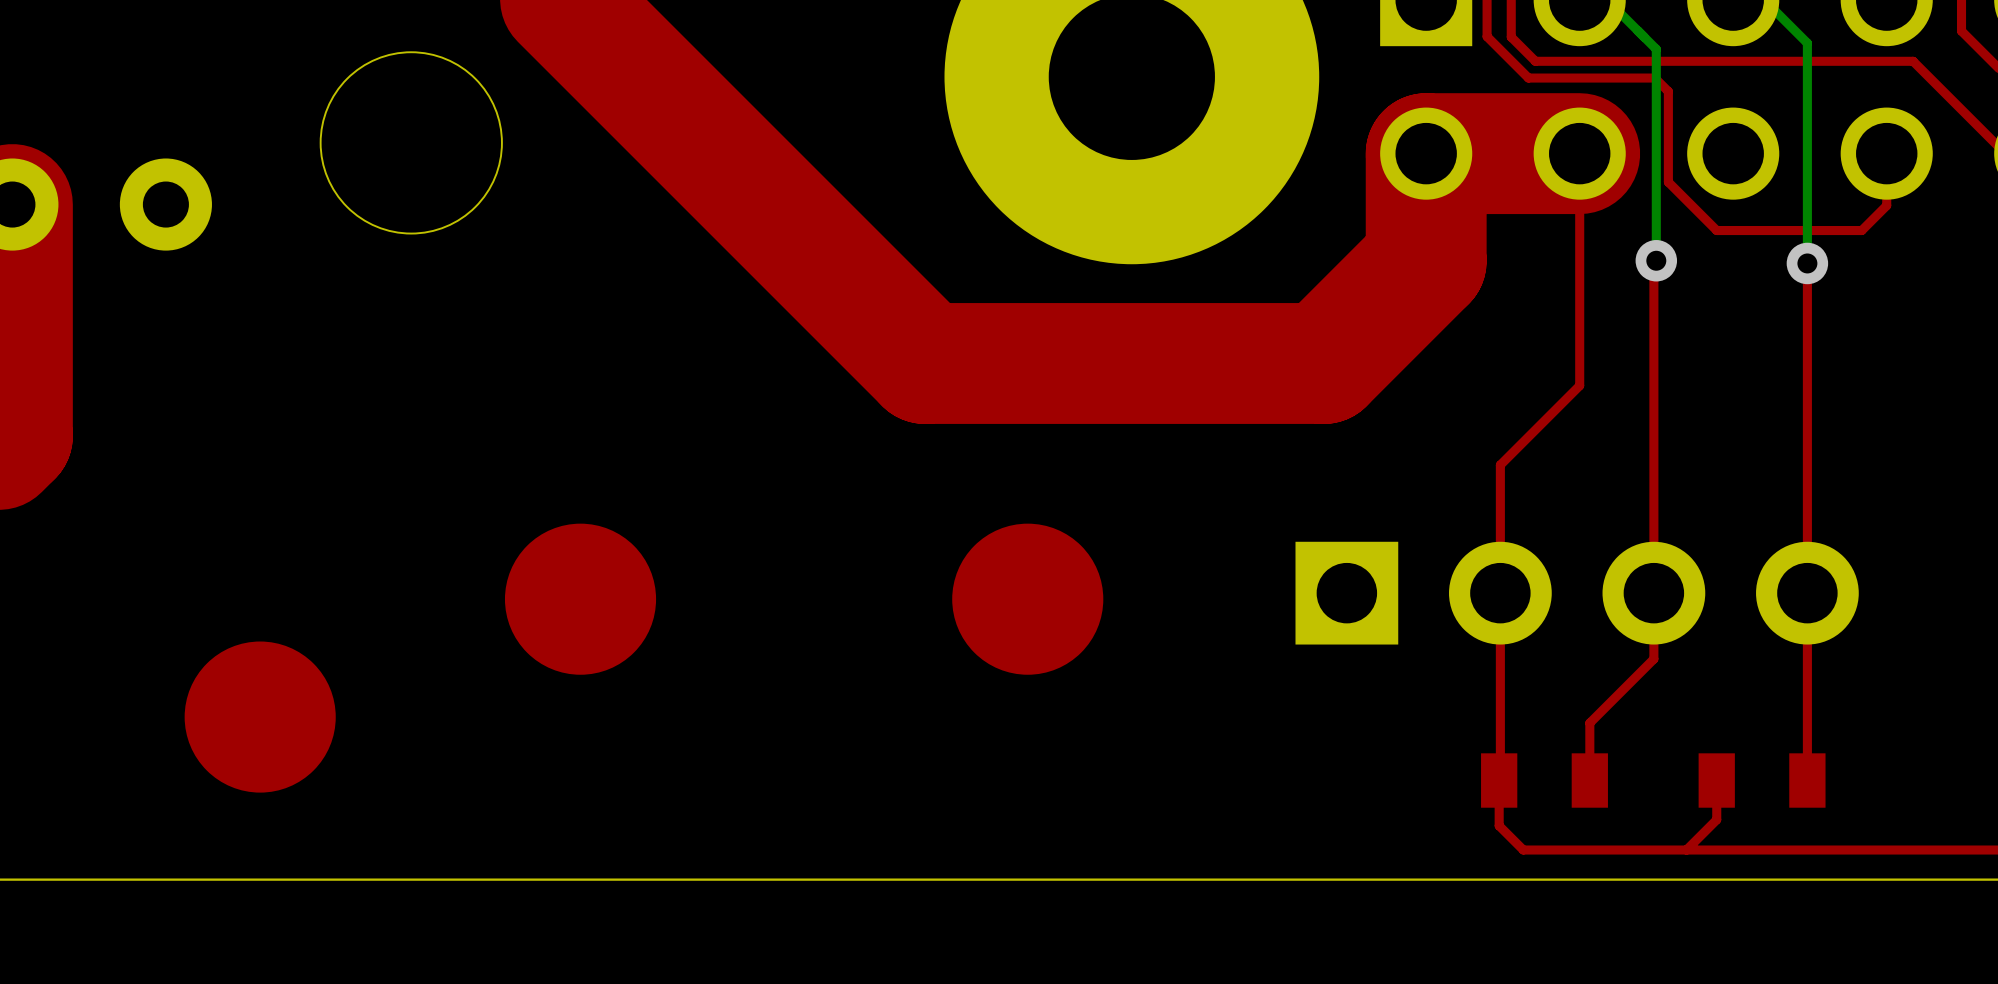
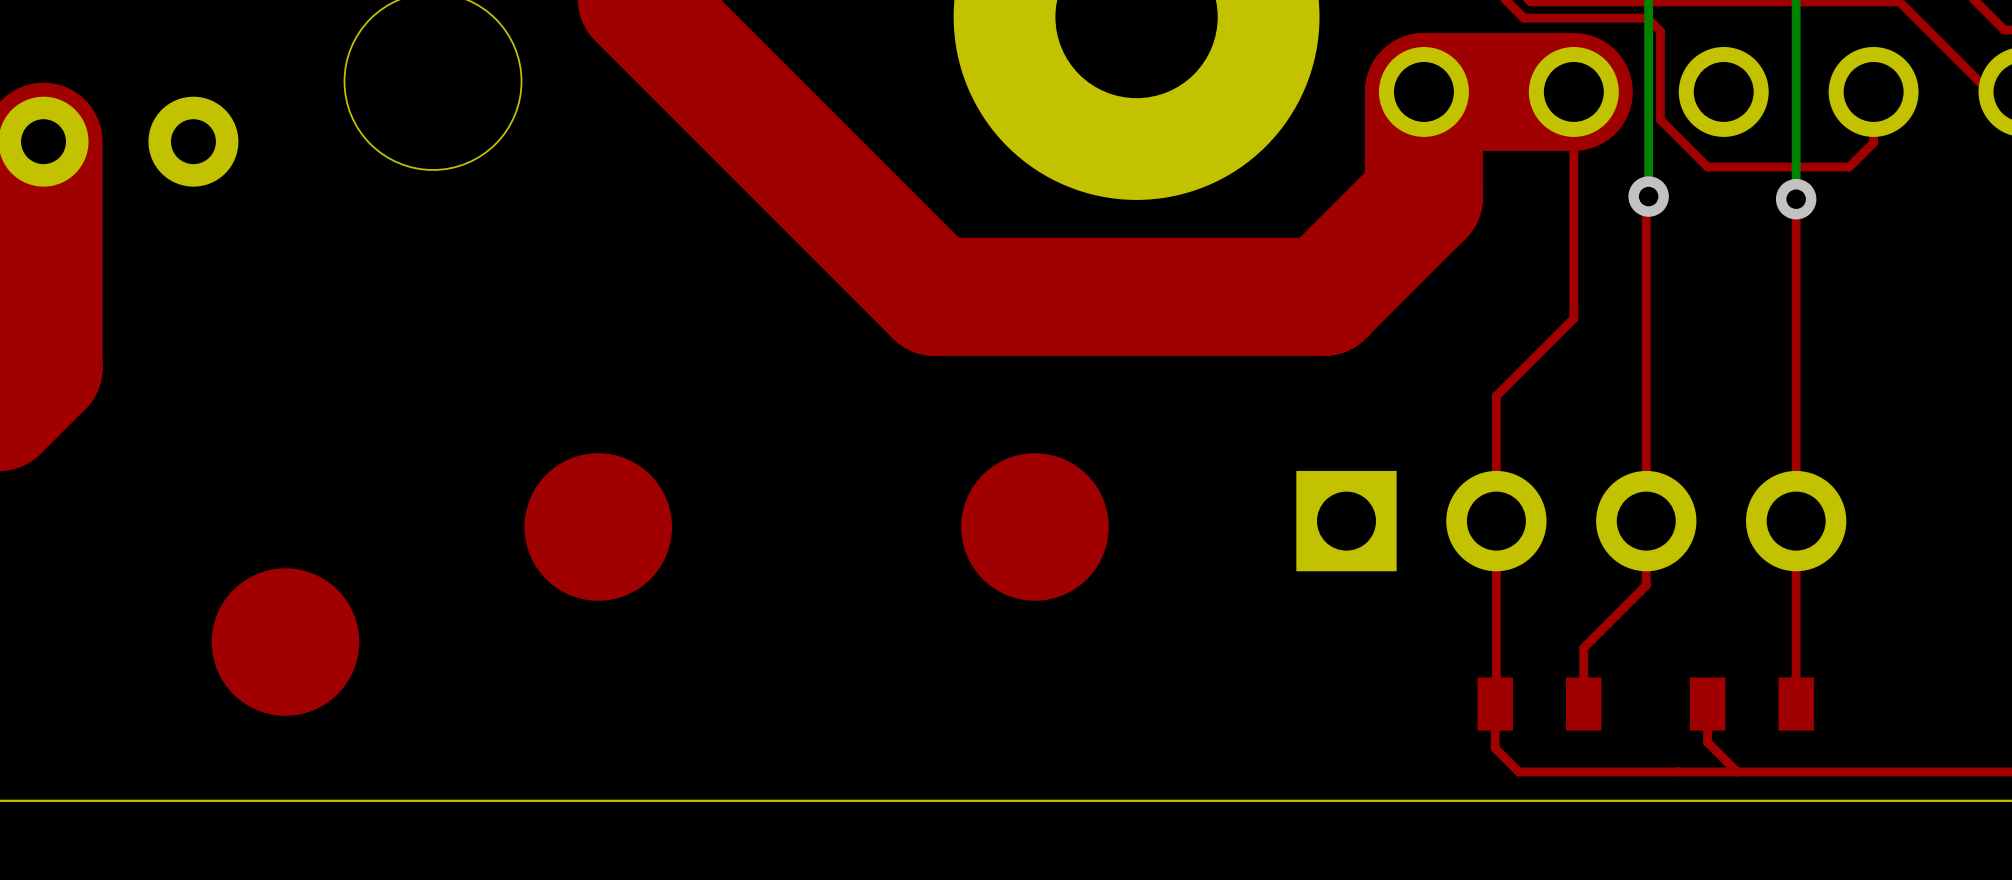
top track: (1716, 819) (1686, 850) -> (1707, 742) (1737, 771)

